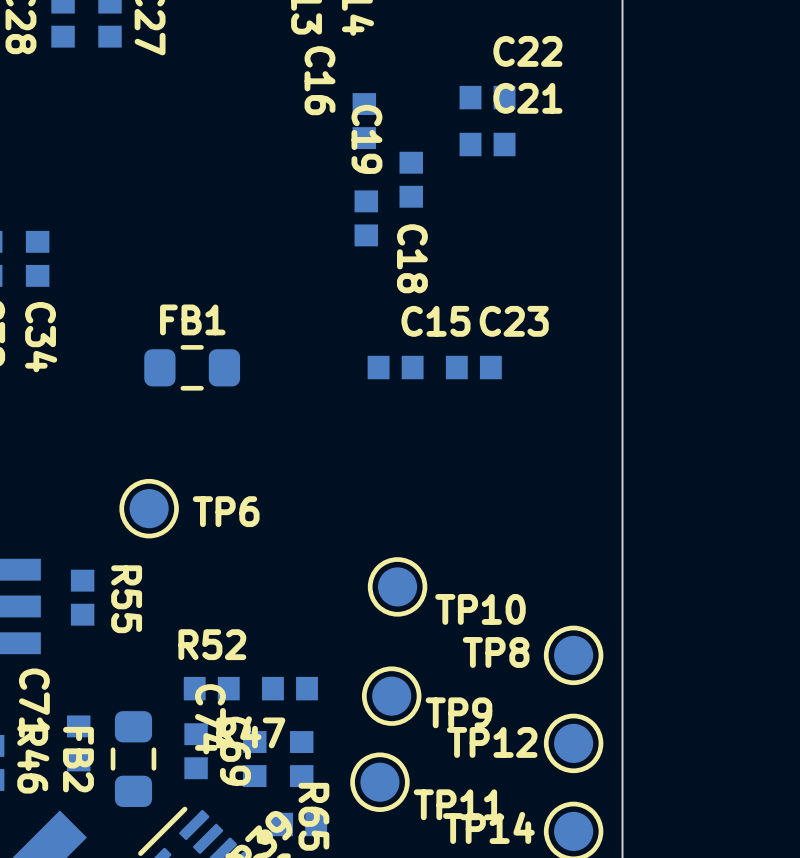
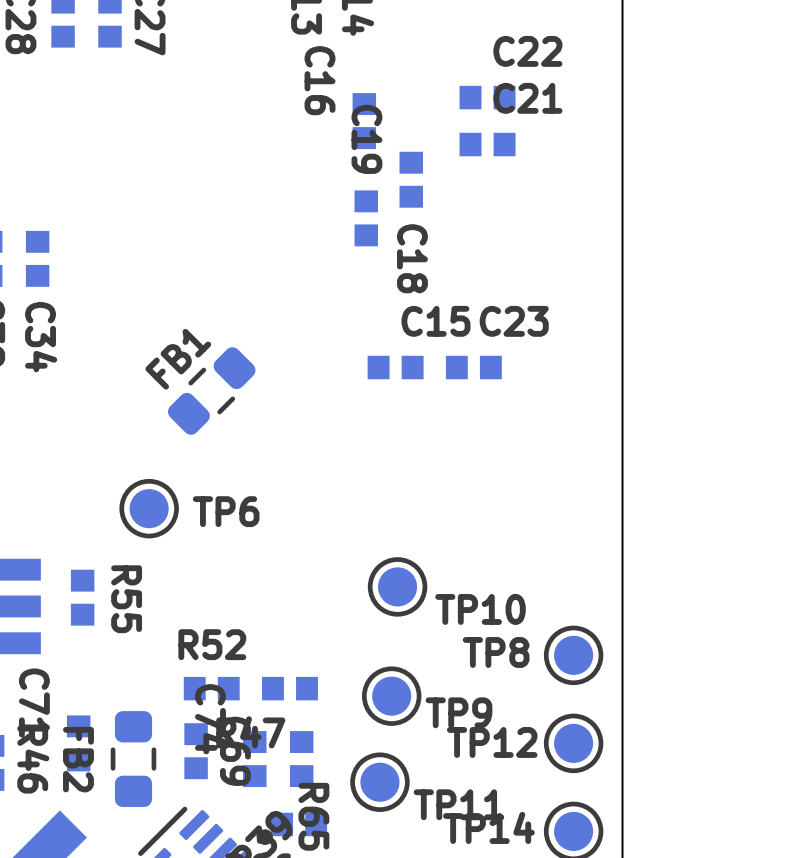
FB1 rotation: 0° (192, 367) -> 45° counterclockwise (211, 391)

